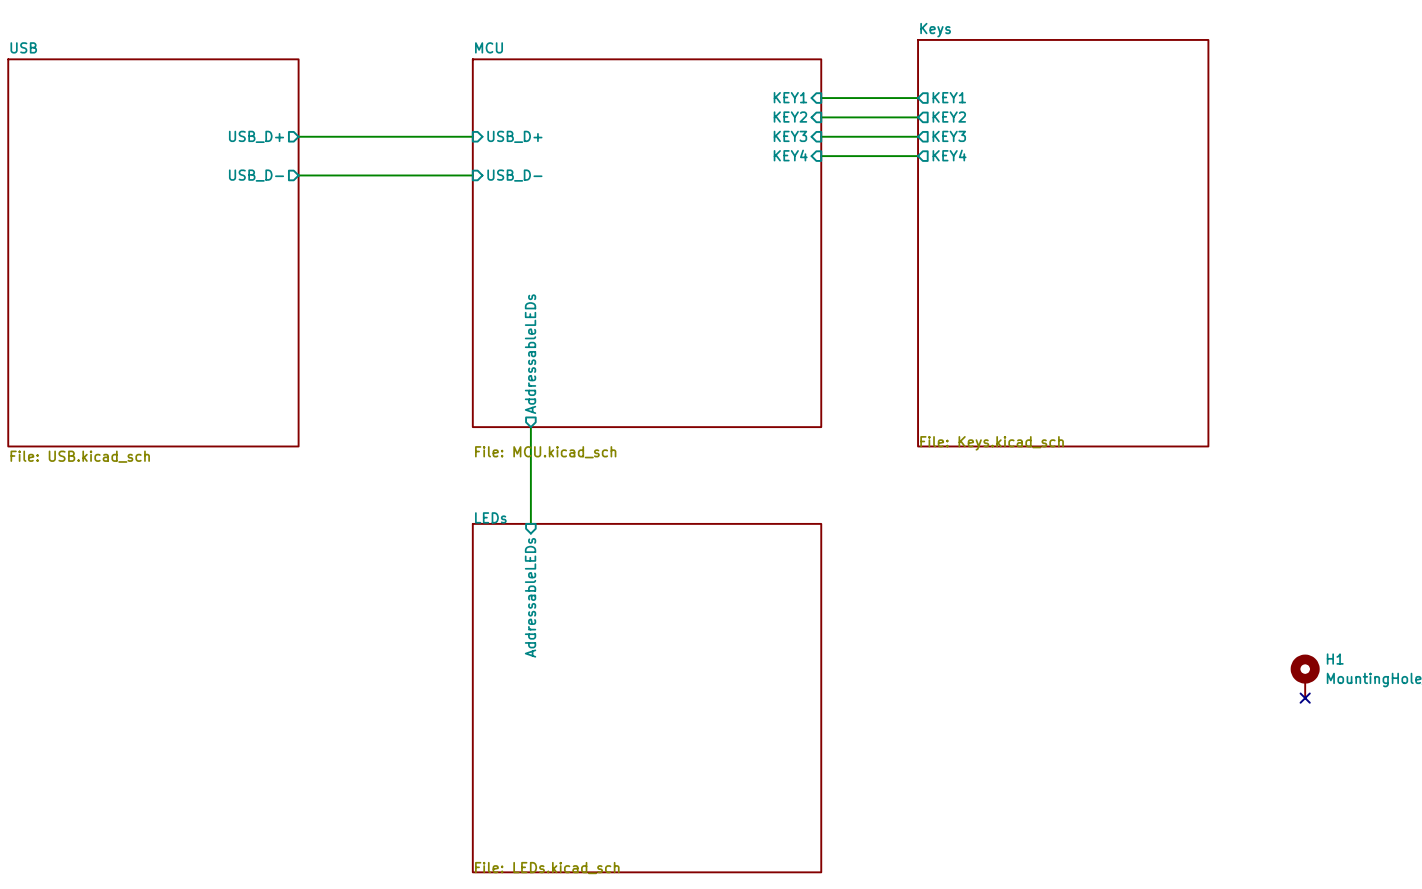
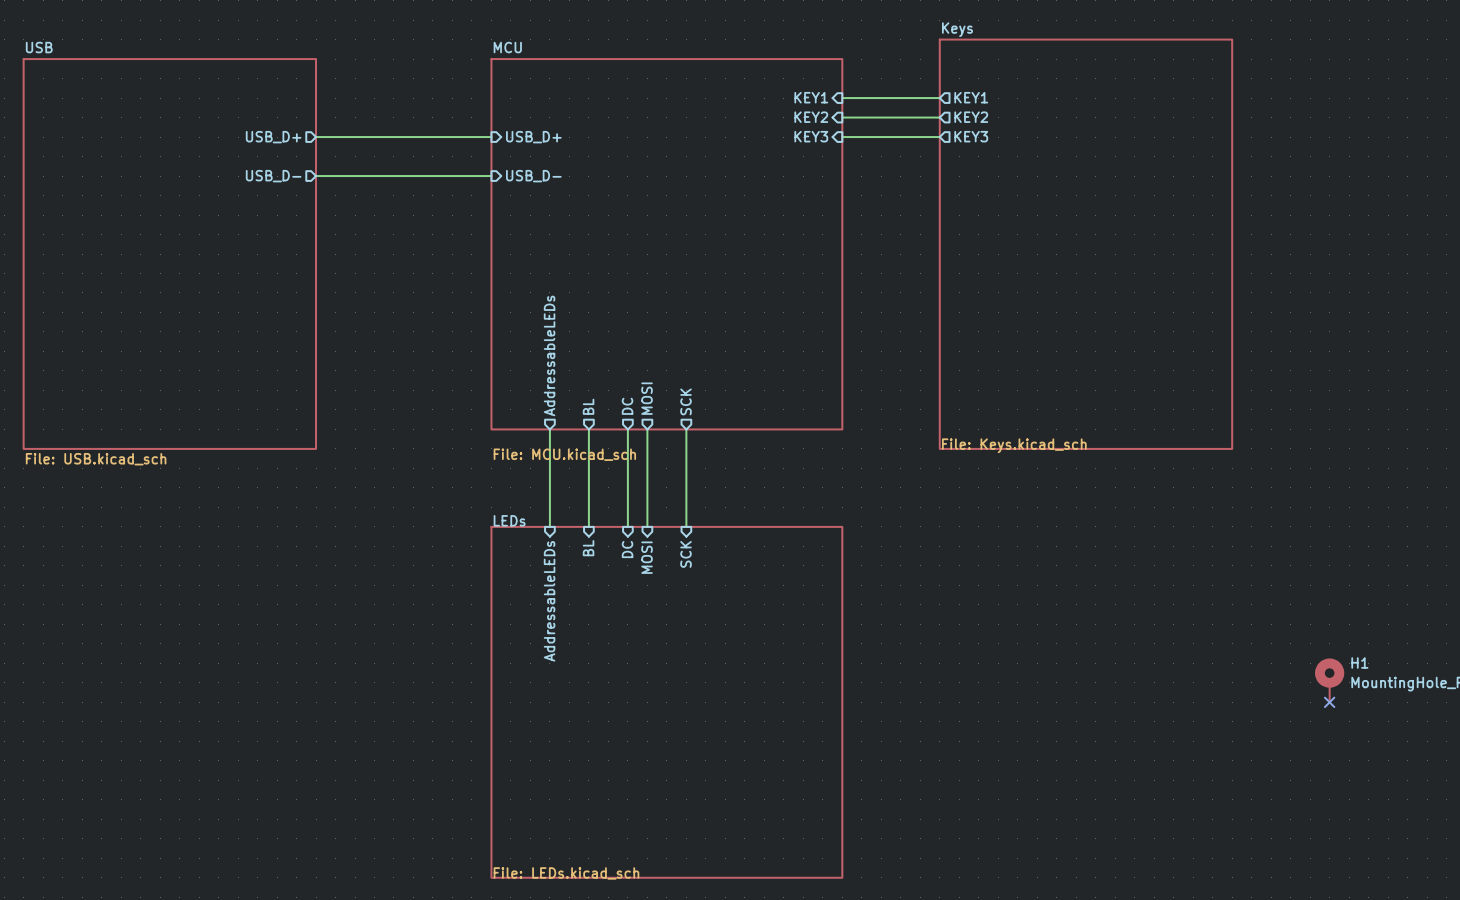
sheet pin: KEY4 (790, 155) -> none
sheet pin: KEY4 (949, 155) -> none
wire: (821, 156) (918, 156) -> none
sheet pin: none -> MOSI (647, 398)
sheet pin: none -> SCK (686, 401)
sheet pin: none -> BL (588, 406)
sheet pin: none -> DC (627, 406)
wire: none -> (588, 429) (588, 526)
wire: none -> (627, 429) (627, 526)
wire: none -> (647, 429) (647, 526)
wire: none -> (686, 429) (686, 526)
sheet pin: none -> BL (588, 548)
sheet pin: none -> DC (627, 549)
sheet pin: none -> SCK (686, 554)
sheet pin: none -> MOSI (647, 557)

